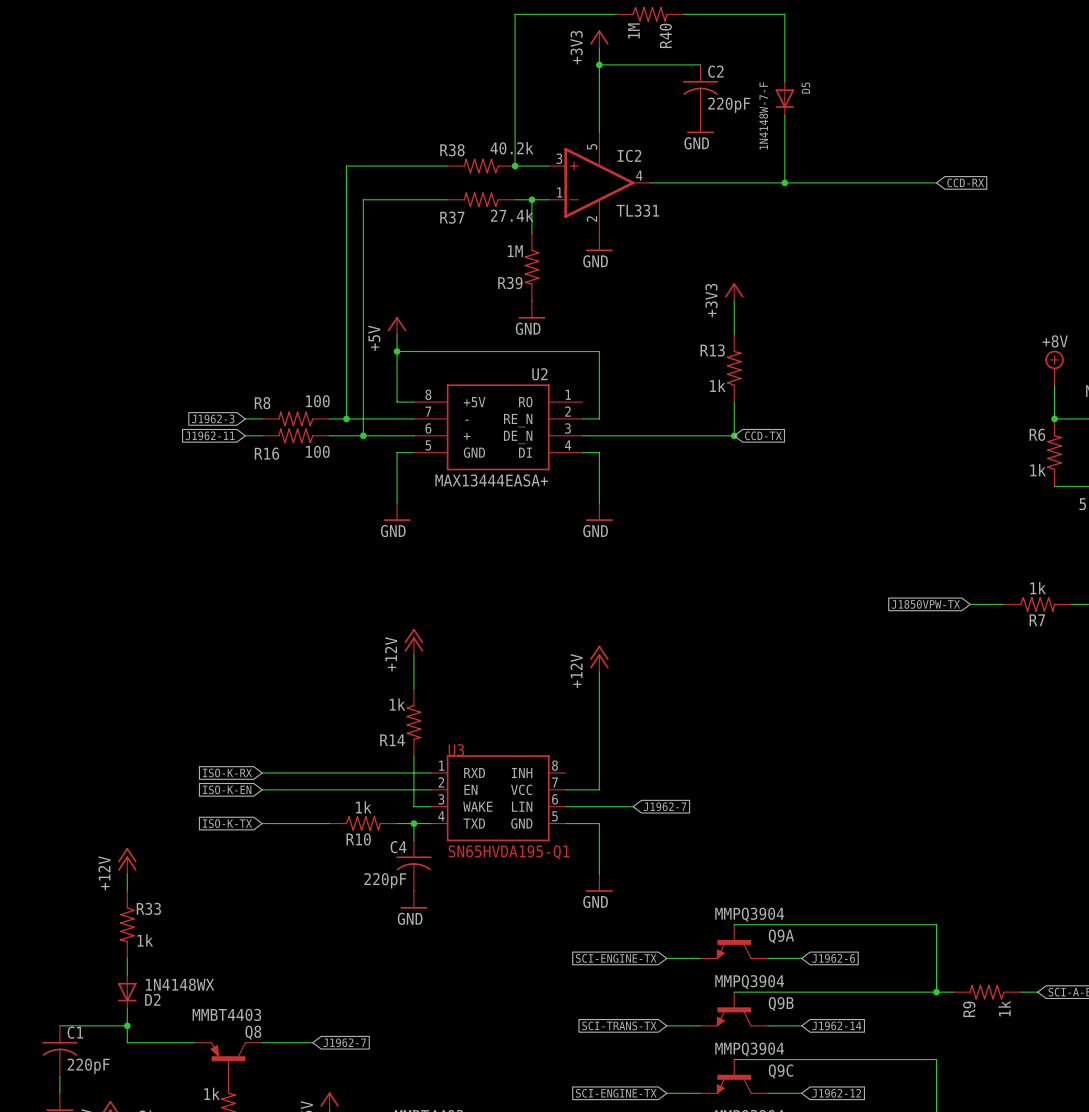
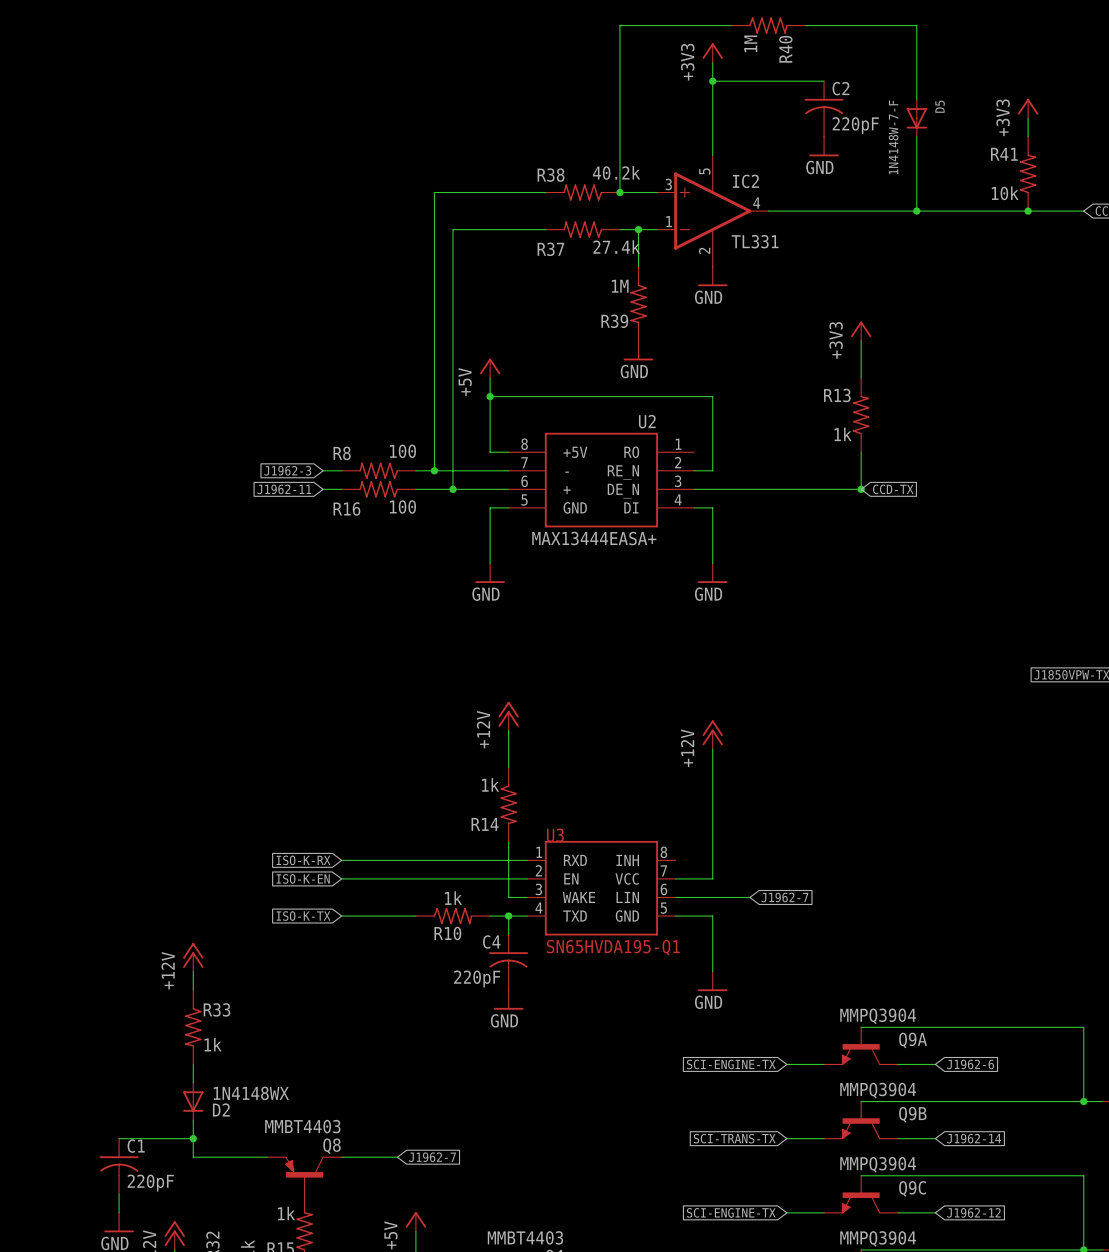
power symbol: none -> +3V3 (1028, 108)
wire: none -> (1028, 118) (1028, 136)
R41: none -> 10k (1028, 173)
junction: none -> (1028, 211)

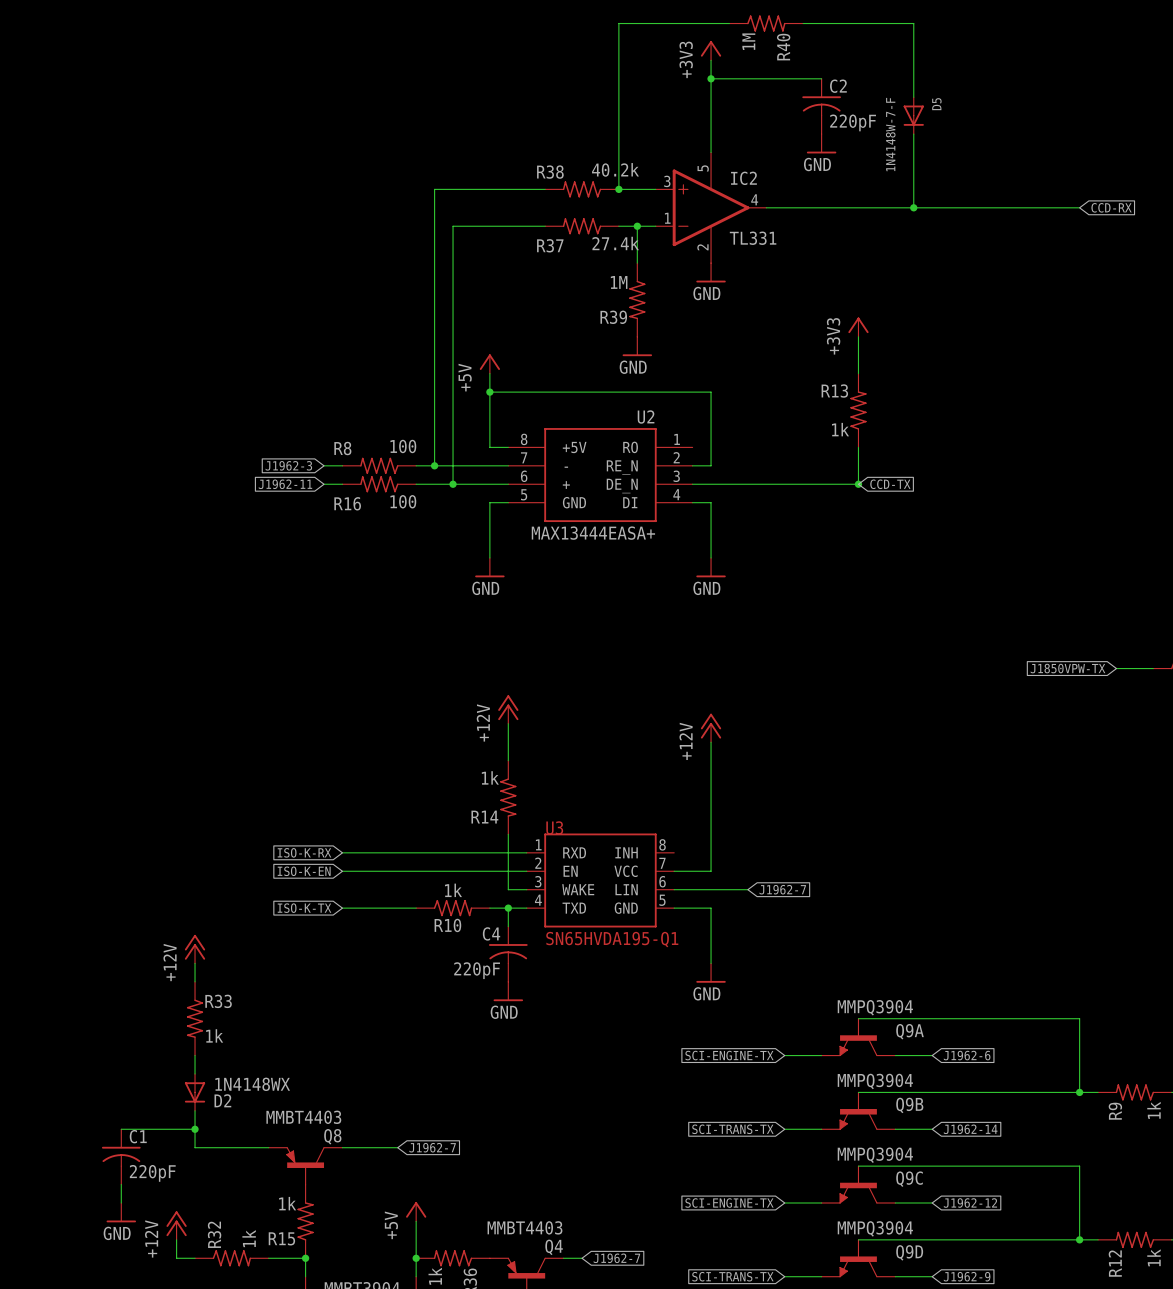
power symbol: +3V3 (1028, 108) -> none
wire: (1028, 118) (1028, 136) -> none
R41: 10k (1028, 173) -> none
junction: (1028, 211) -> none

